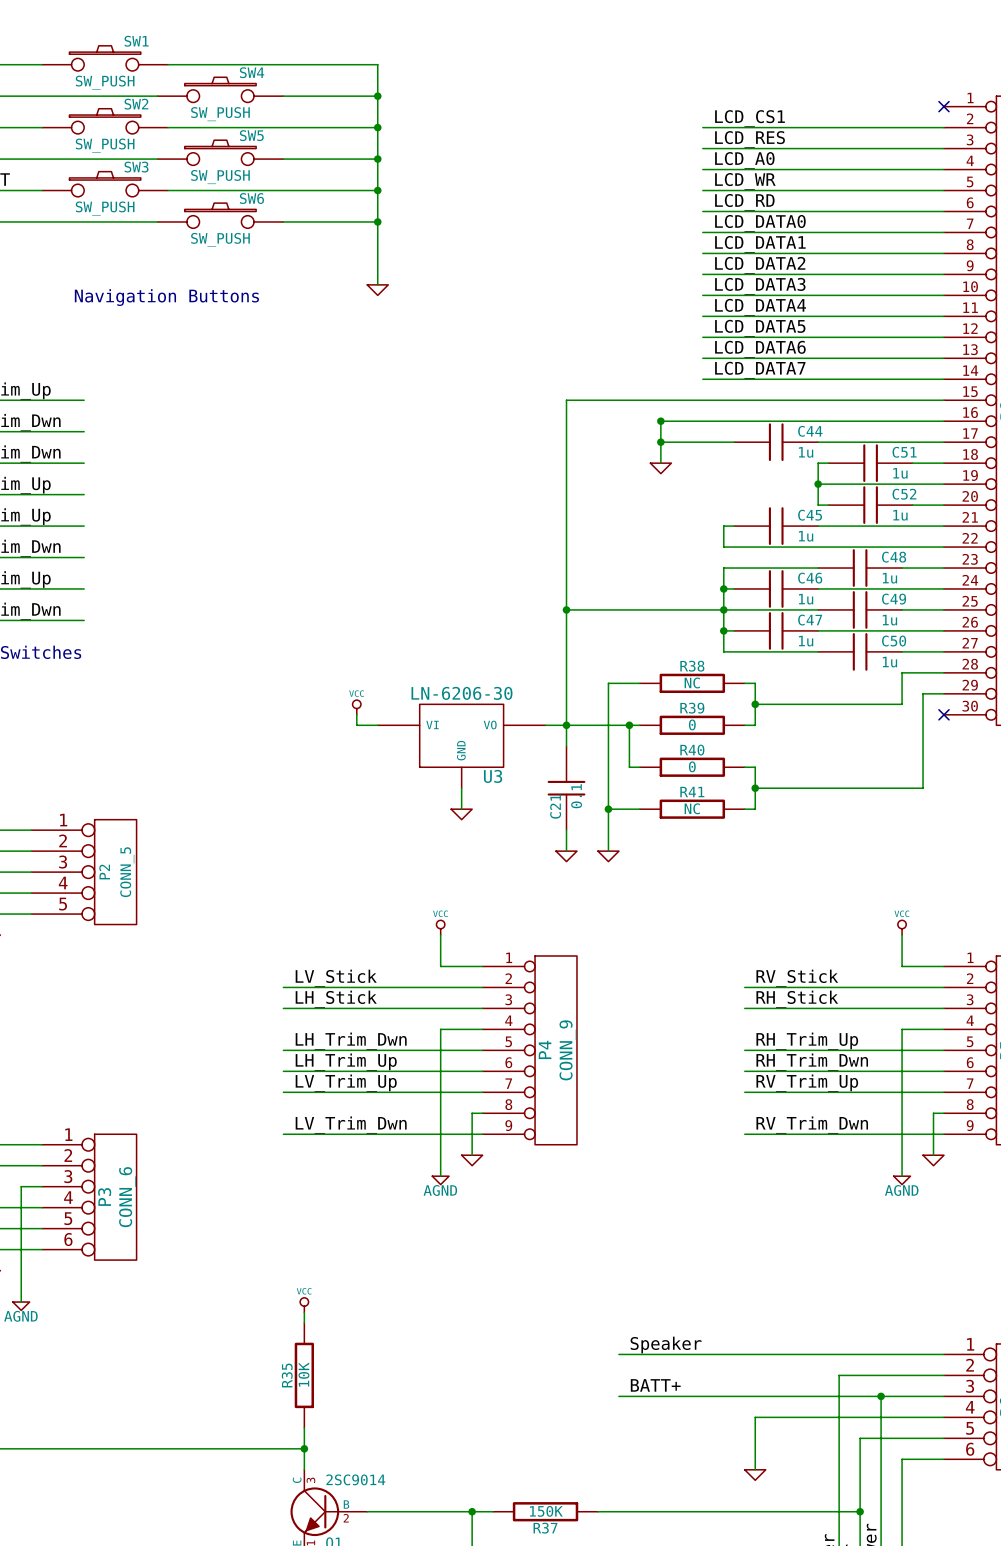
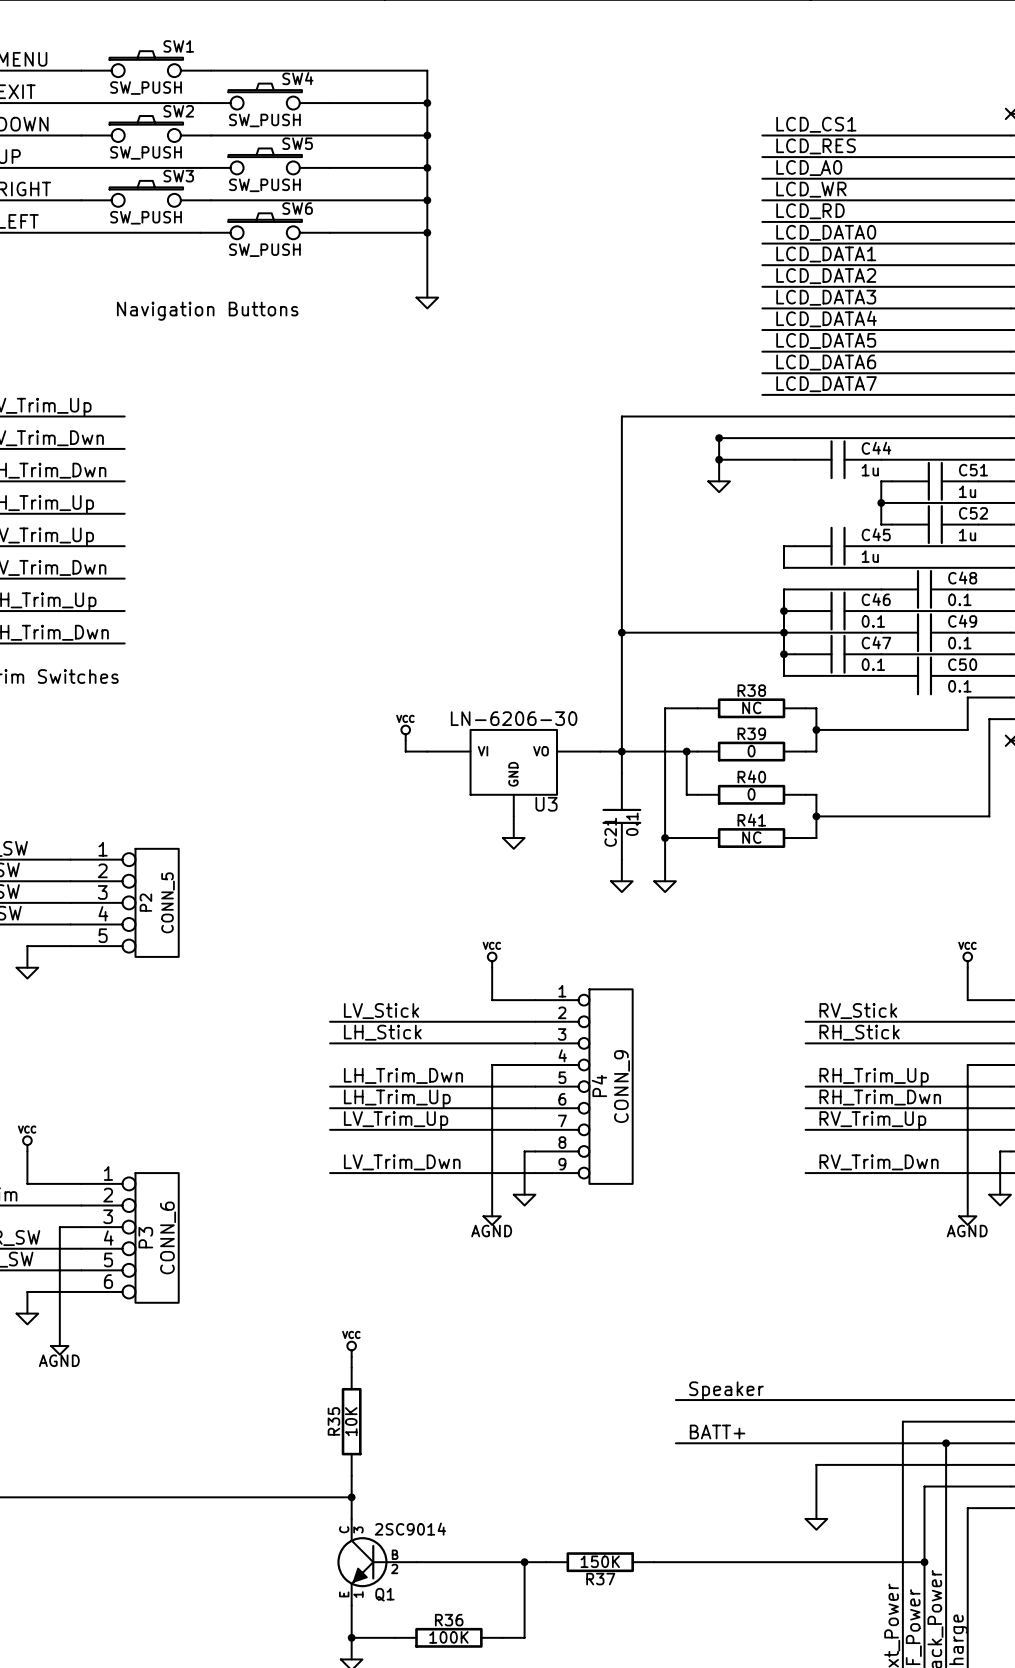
C48 value: 1u (889, 578) -> 0.1 (959, 599)
C46 value: 1u (806, 599) -> 0.1 (873, 621)
C49 value: 1u (889, 620) -> 0.1 (959, 643)
C47 value: 1u (806, 641) -> 0.1 (873, 664)
C50 value: 1u (889, 662) -> 0.1 (959, 686)

